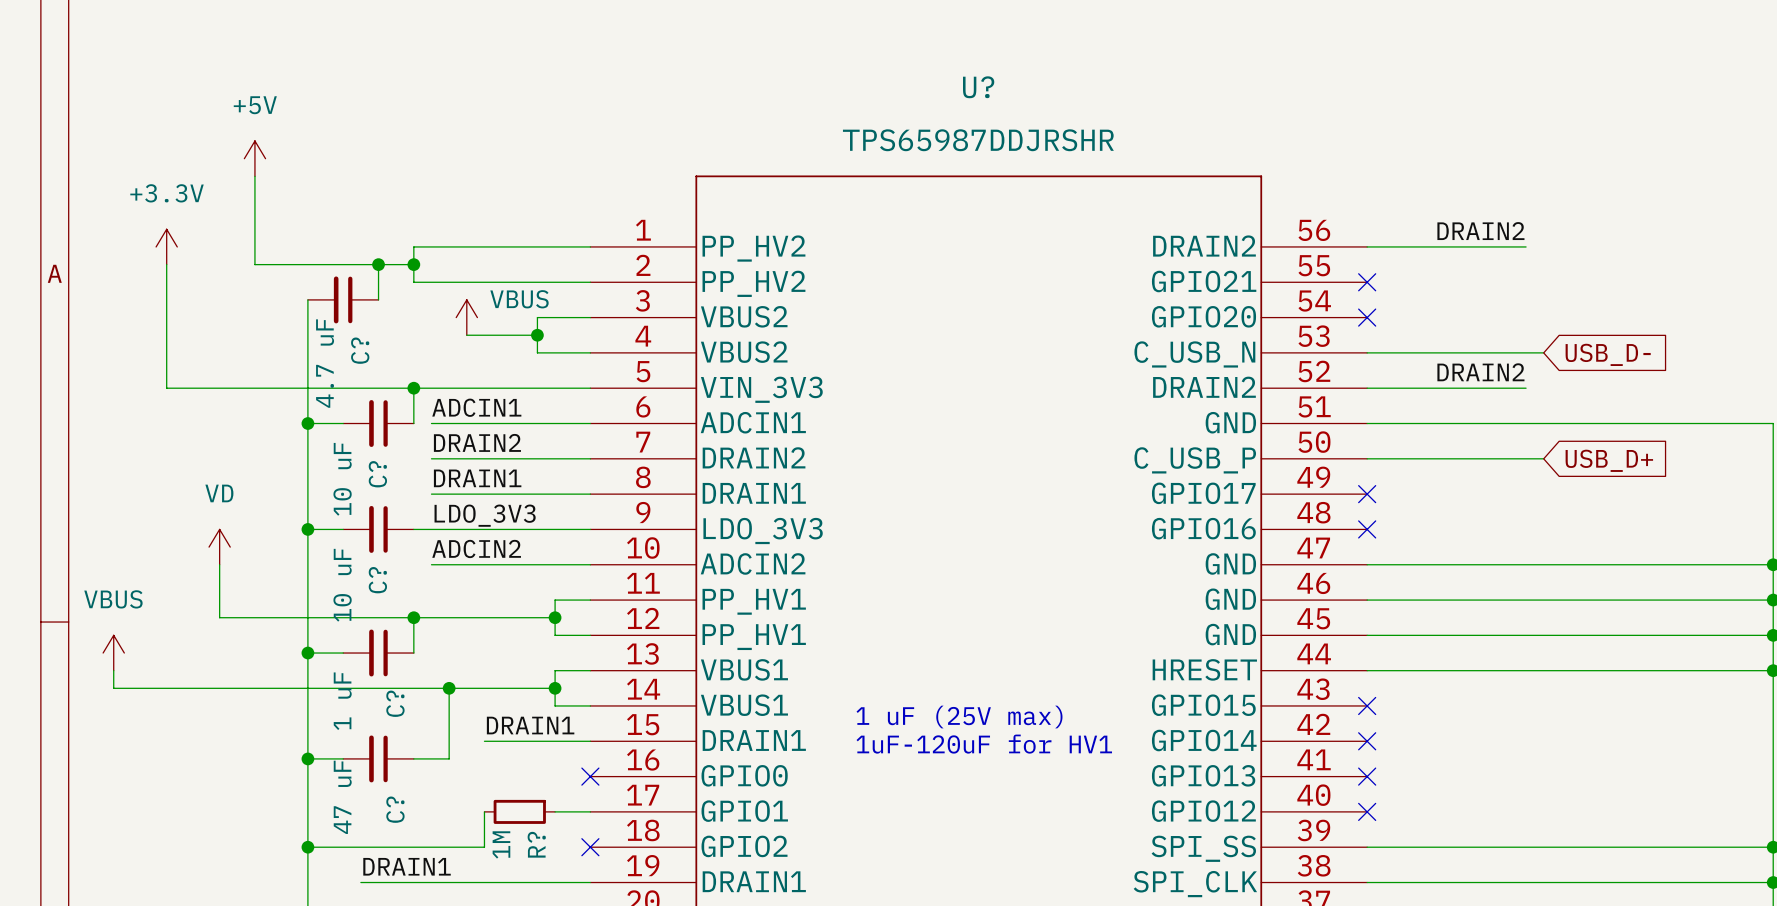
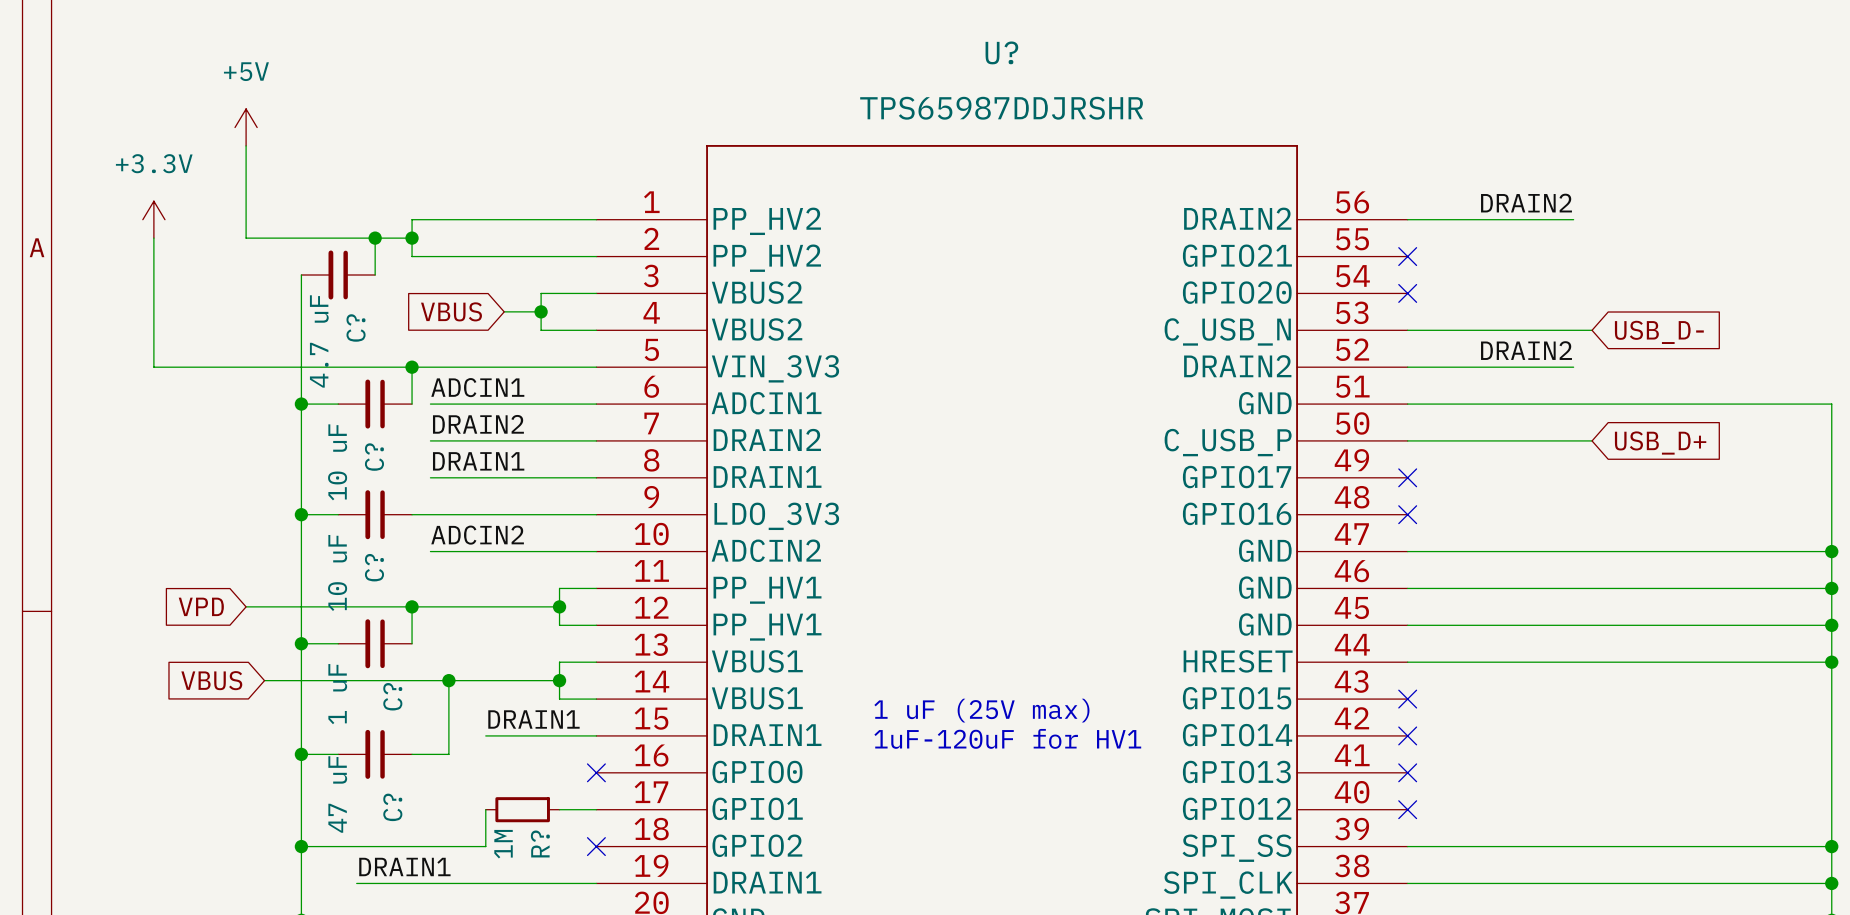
power symbol: VBUS (466, 317) -> none
global label: none -> VBUS (451, 311)
wire: (466, 335) (502, 335) -> none
label: LDO_3V3 (485, 515) -> none
power symbol: VD (219, 547) -> none
wire: (219, 564) (219, 617) (254, 617) -> none
global label: none -> VPD (201, 606)
power symbol: VBUS (113, 653) -> none
wire: (113, 670) (113, 688) (272, 688) -> none
global label: none -> VBUS (211, 680)

